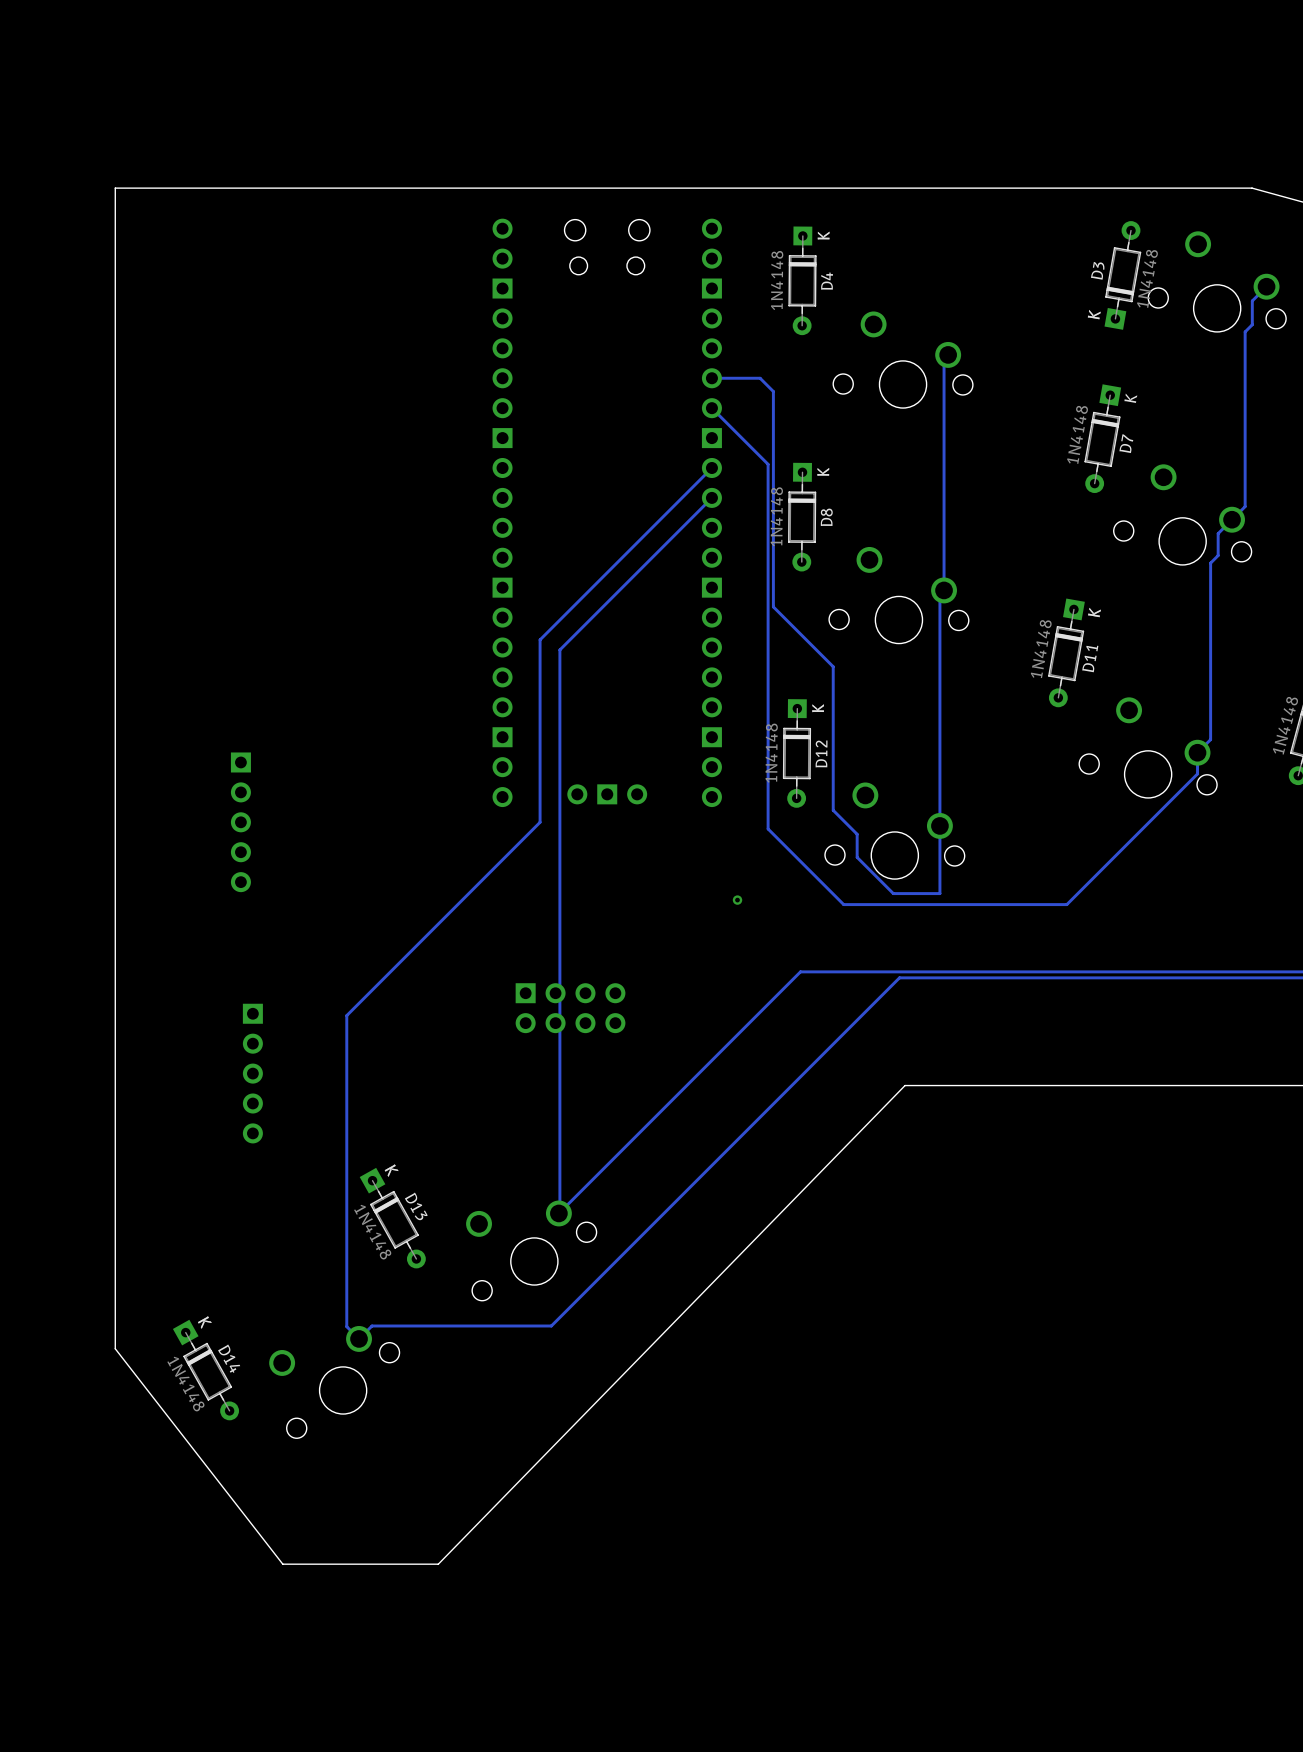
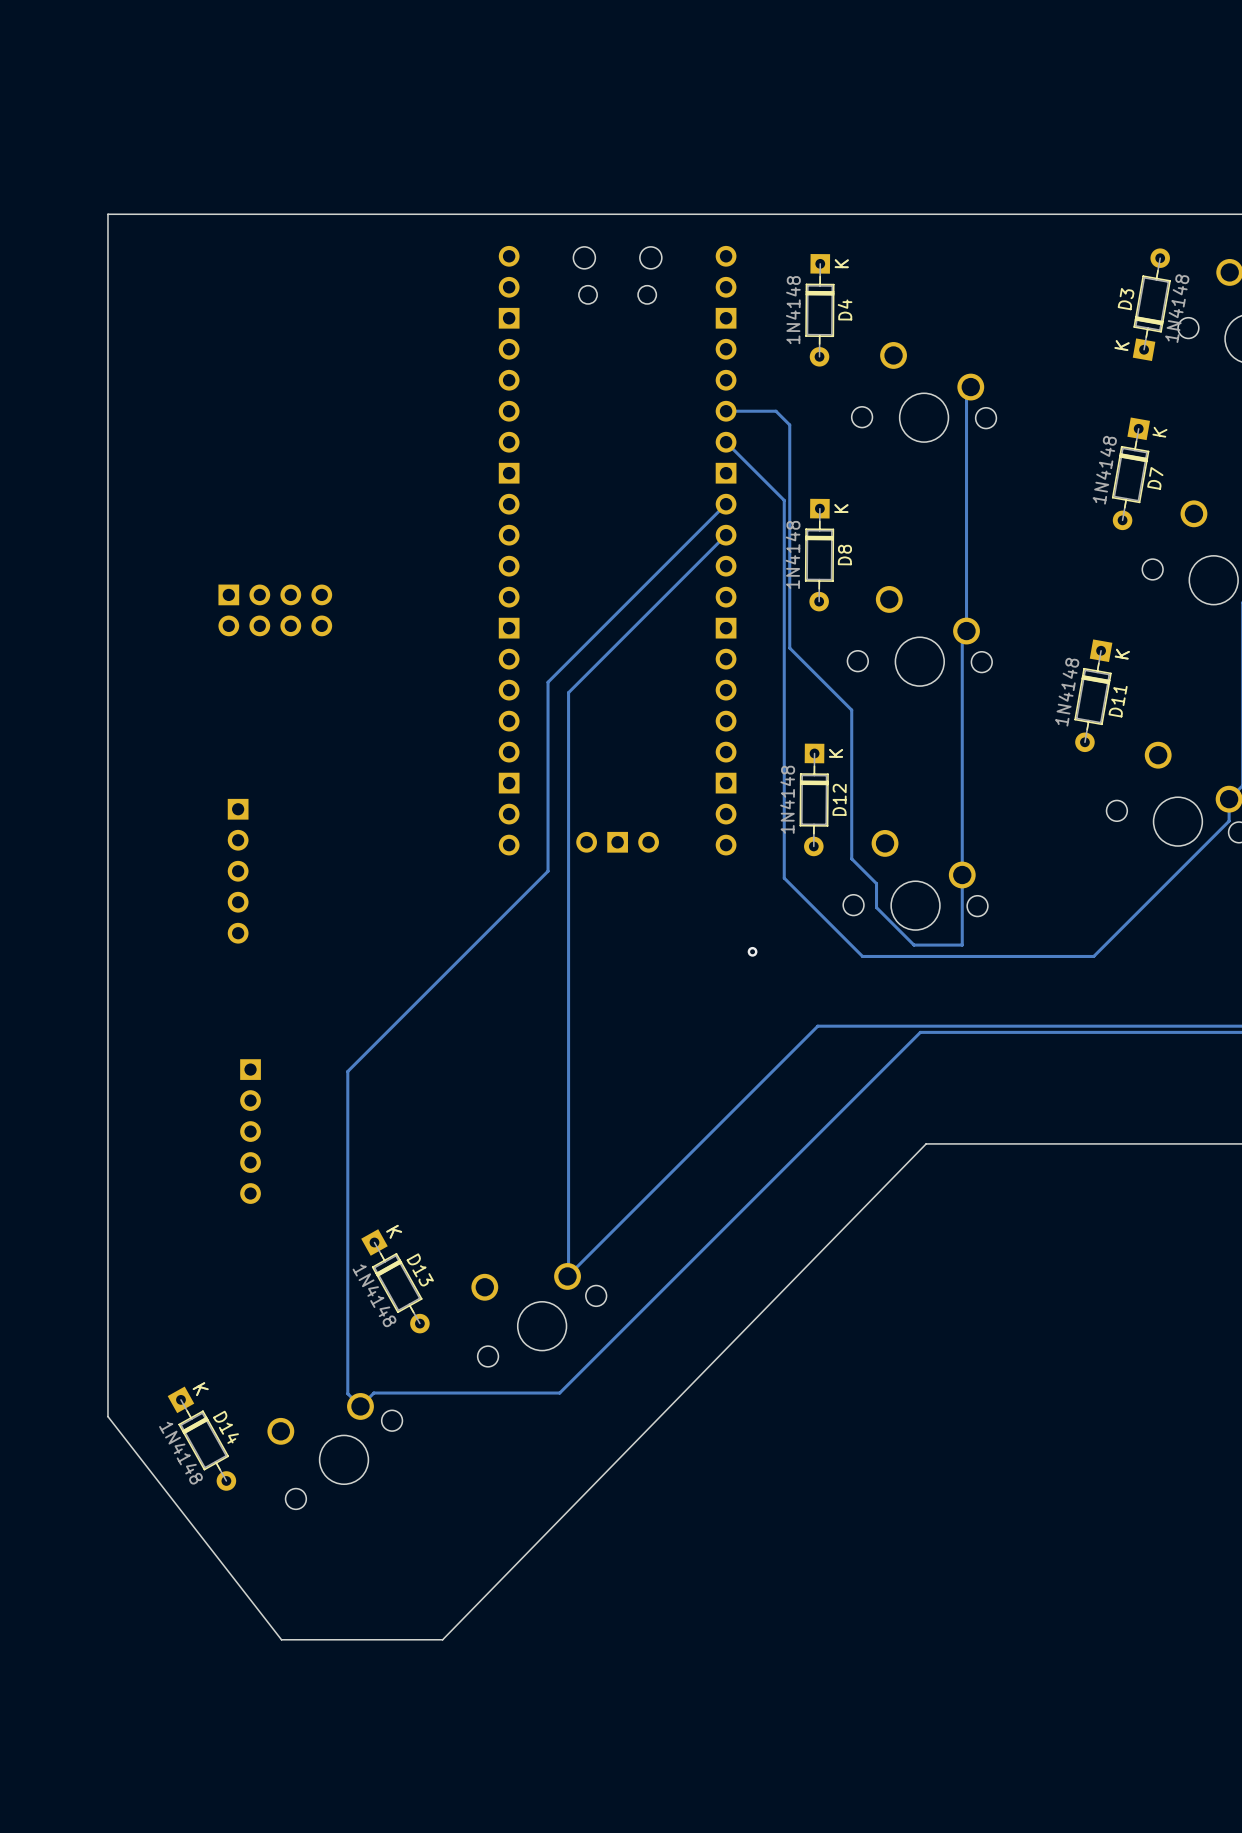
part: none -> (275, 610)
part: (570, 1008) -> none

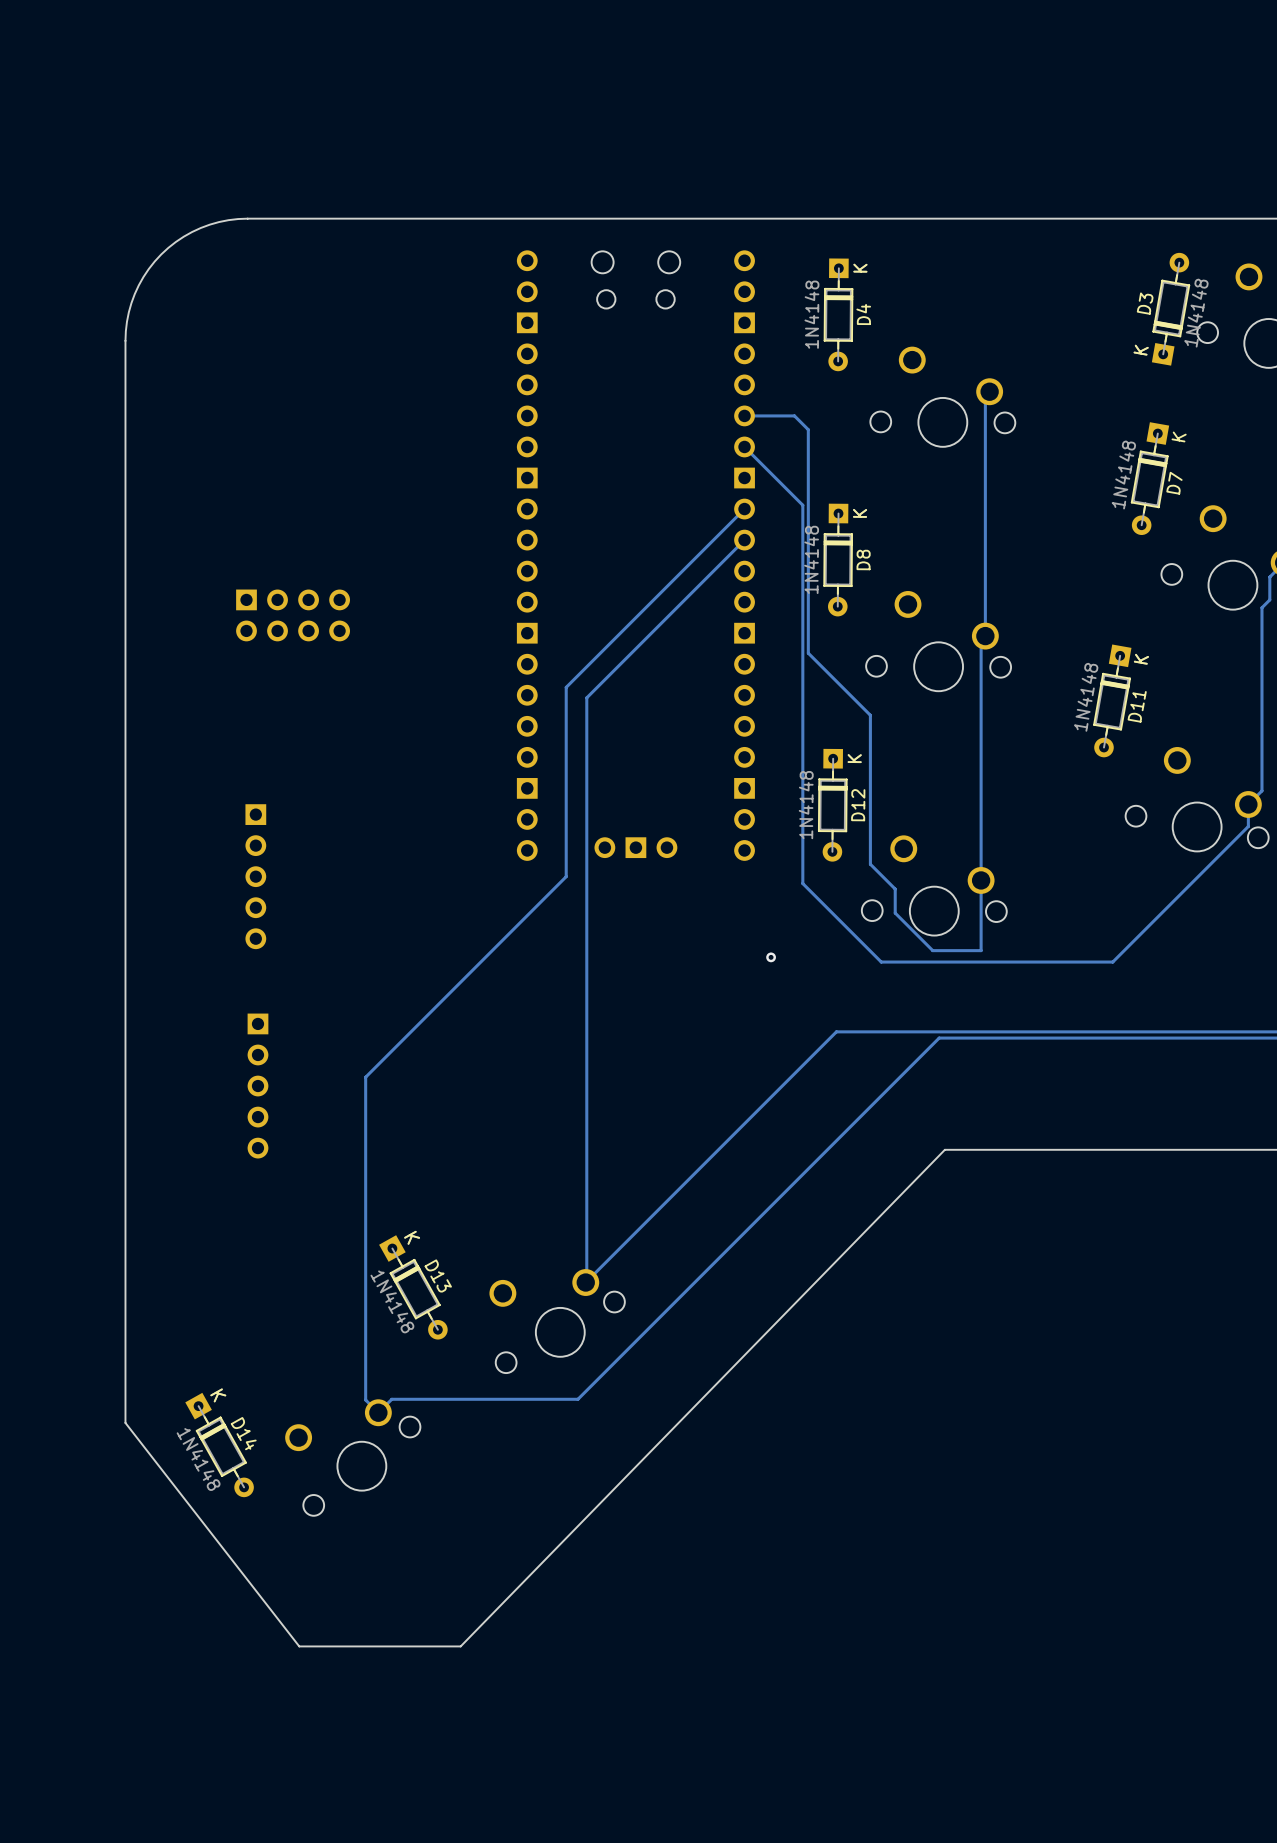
board edge: (229, 214) (107, 214) (107, 336) -> (247, 218) (228, 220) (200, 227) (175, 241) (161, 254) (148, 269) (134, 294) (128, 312) (125, 340)
part position: (250, 1131) -> (257, 1086)

